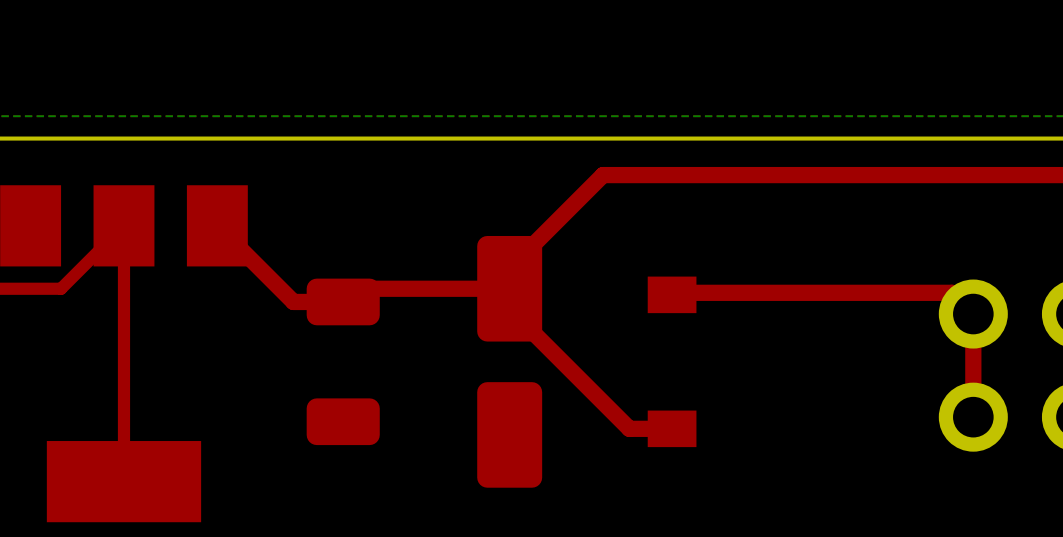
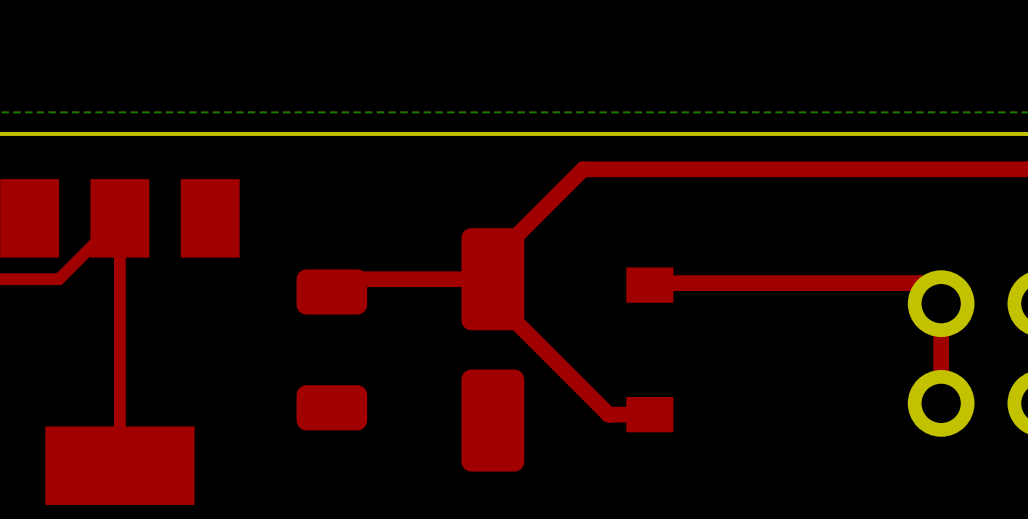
top track: (217, 225) (293, 301) (343, 301) -> none

